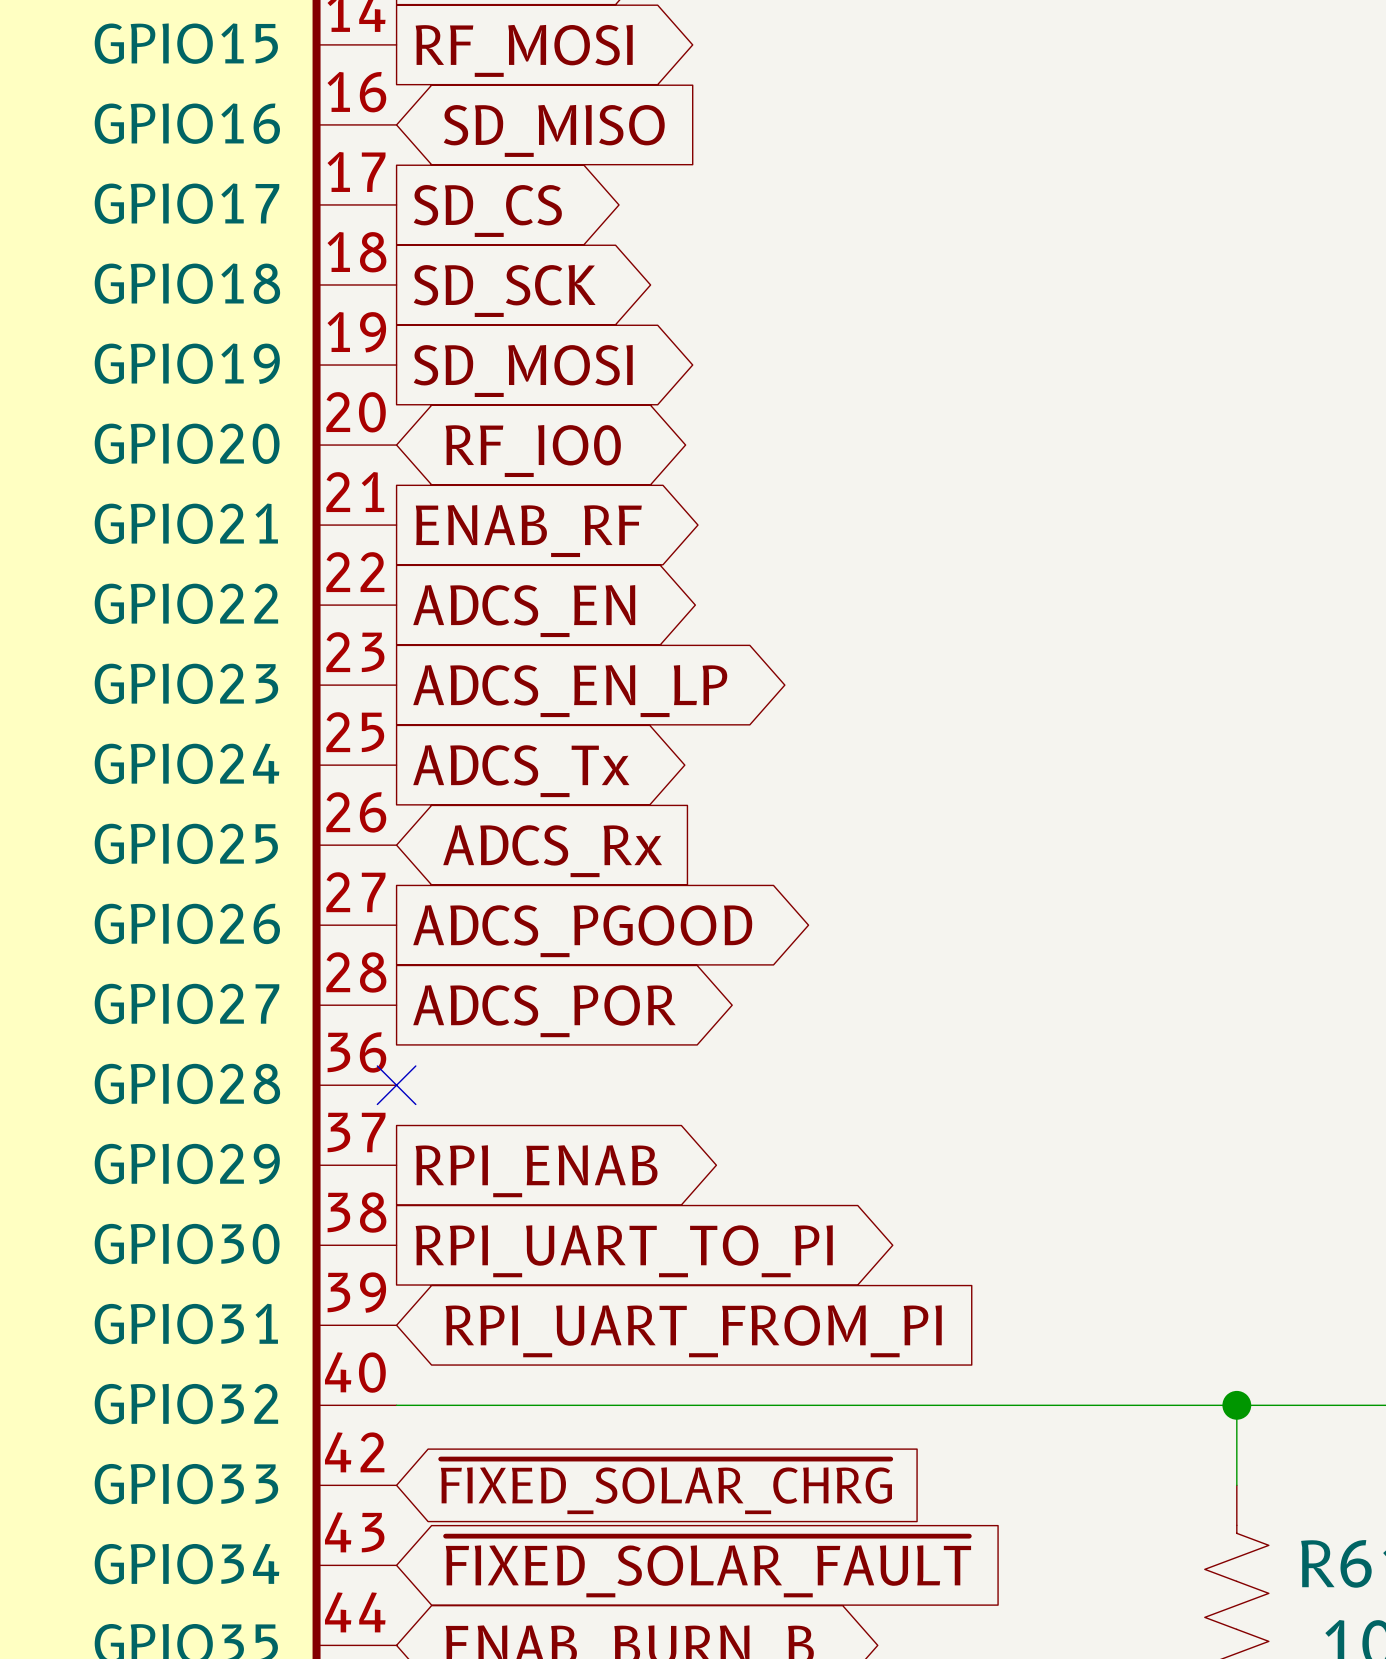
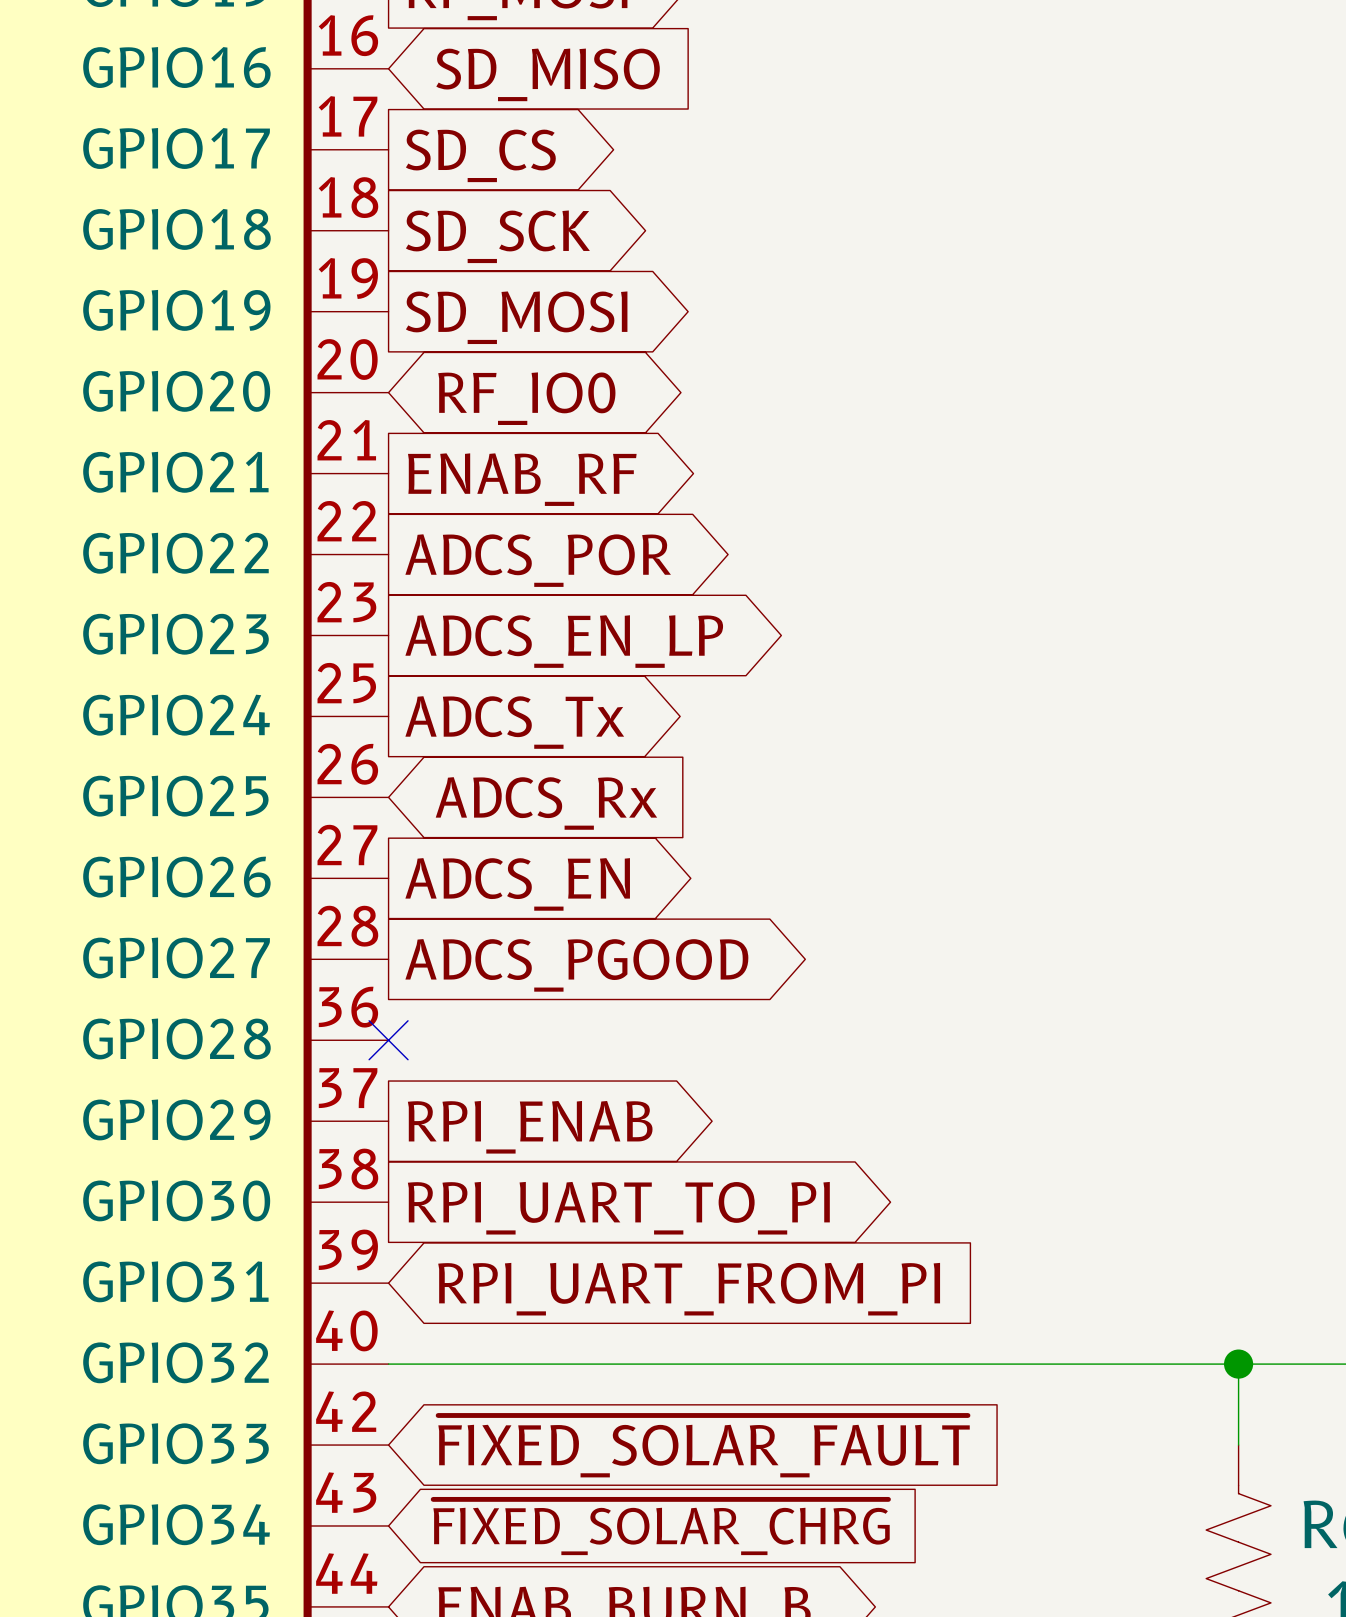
global label: ADCS_EN (524, 611) -> ADCS_POR (538, 560)
global label: ADCS_PGOOD (582, 931) -> ADCS_EN (517, 884)
global label: ADCS_POR (544, 1011) -> ADCS_PGOOD (576, 965)
global label: ~{FIXED_SOLAR_CHRG} (666, 1486) -> ~{FIXED_SOLAR_FAULT} (703, 1446)
global label: ~{FIXED_SOLAR_FAULT} (708, 1566) -> ~{FIXED_SOLAR_CHRG} (661, 1527)

